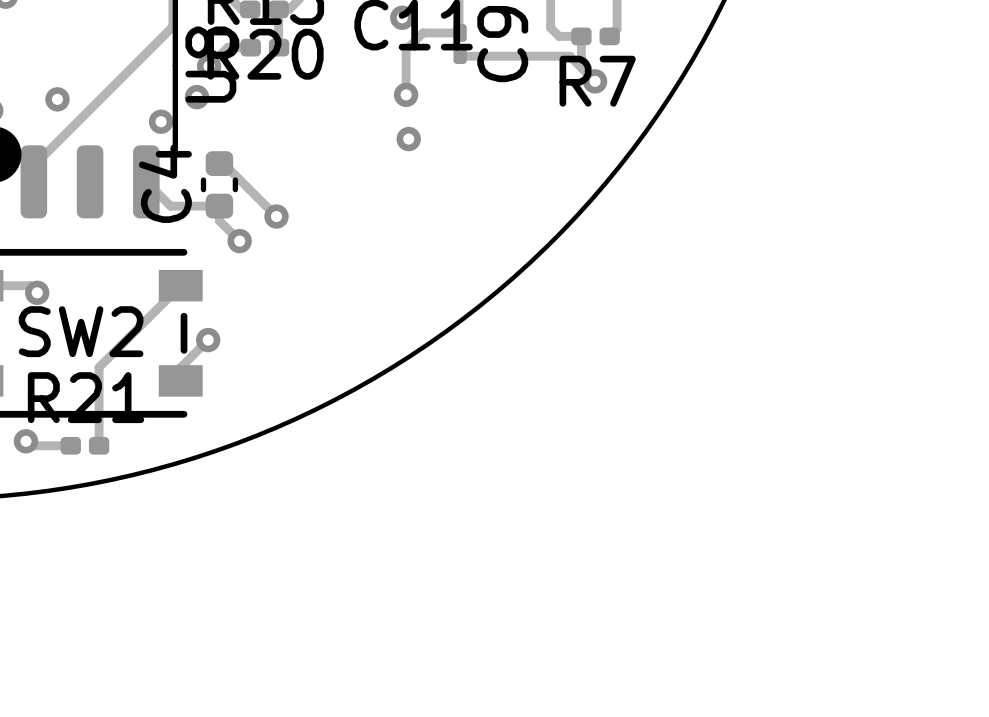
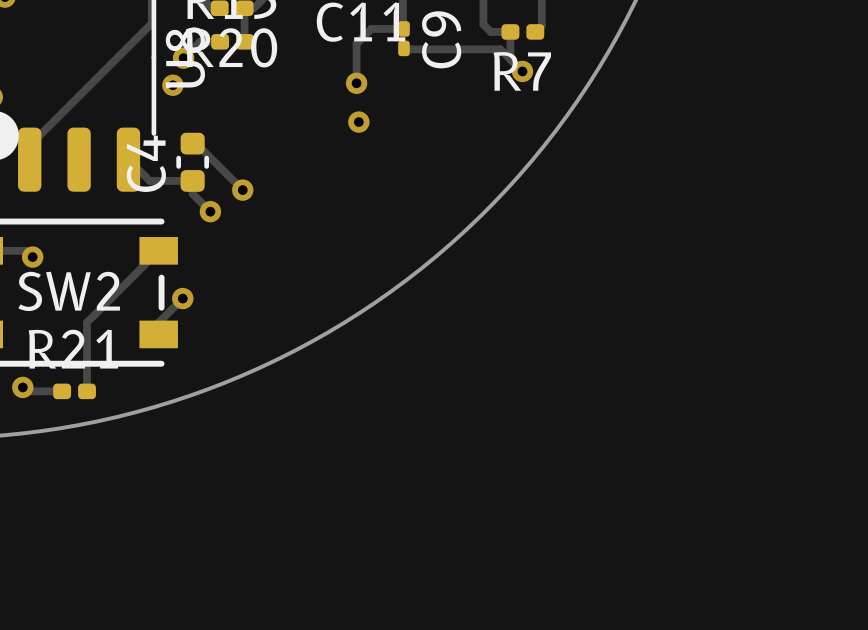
via: (402, 17) -> none
via: (57, 99) -> none
via: (161, 121) -> none

